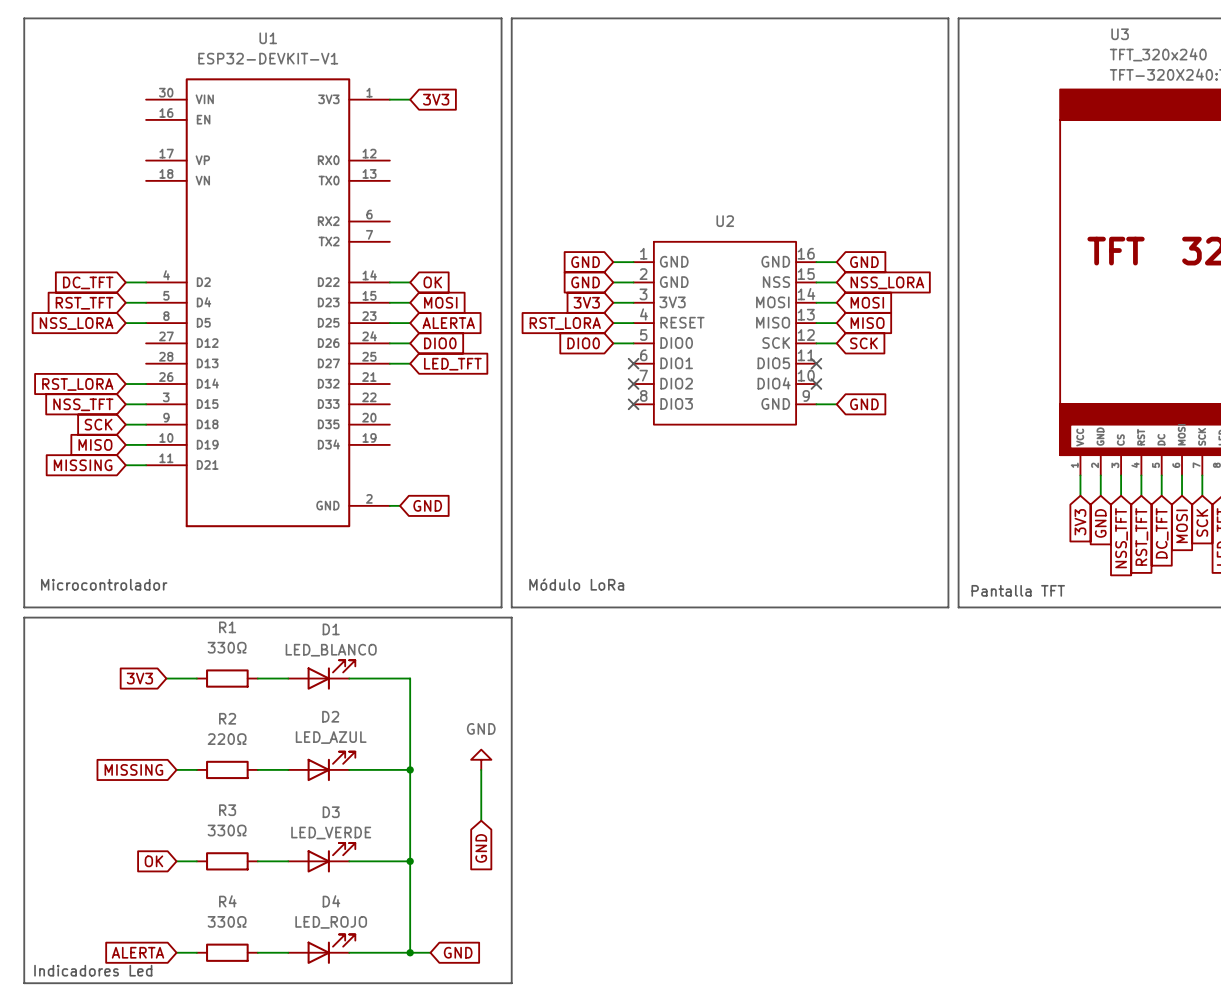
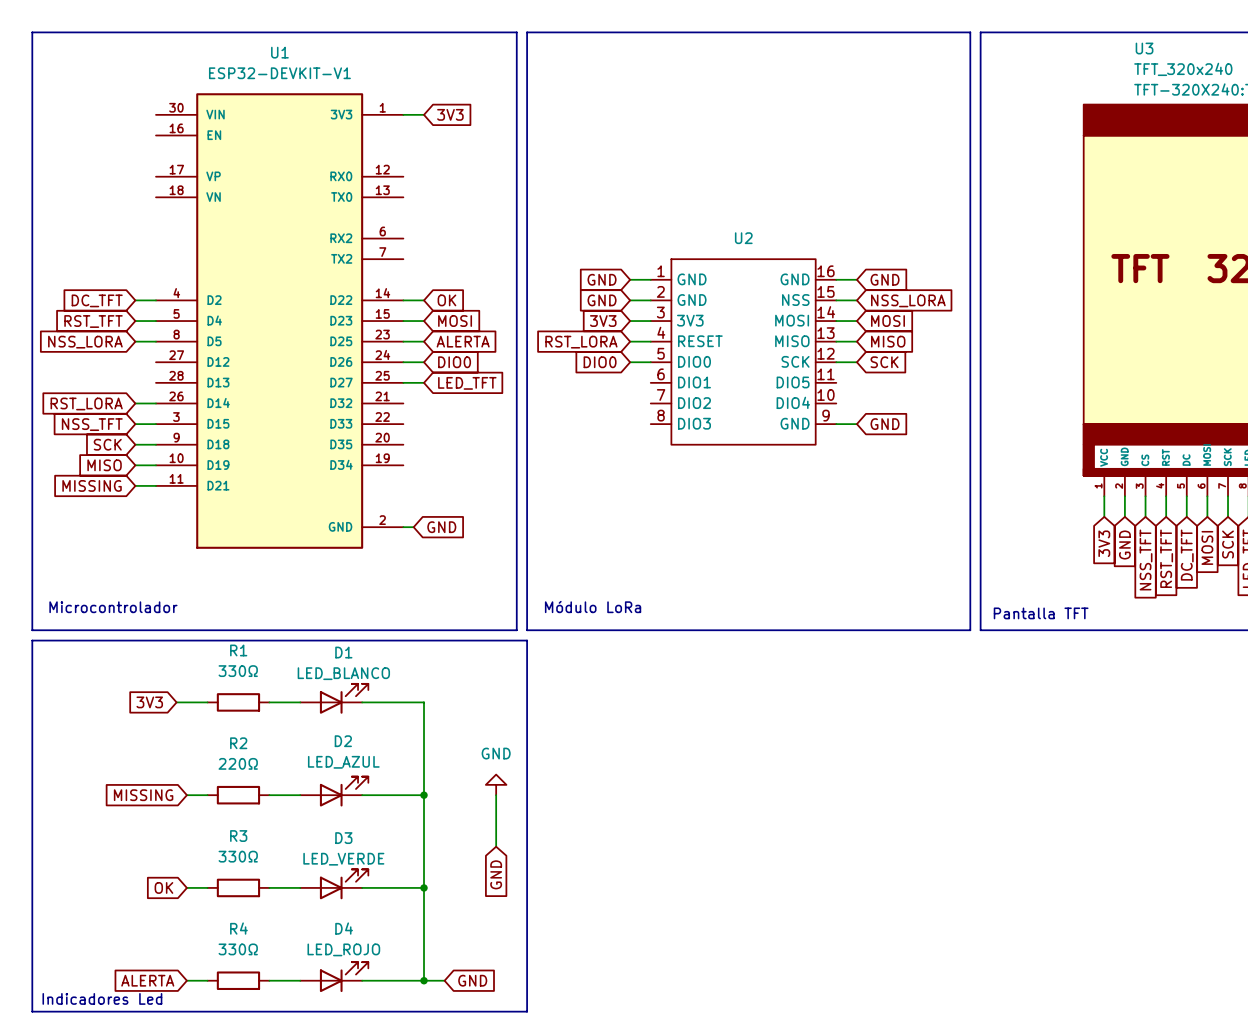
no-connect mark: (633, 363) -> none
no-connect mark: (816, 363) -> none
no-connect mark: (633, 384) -> none
no-connect mark: (816, 384) -> none
no-connect mark: (633, 404) -> none

